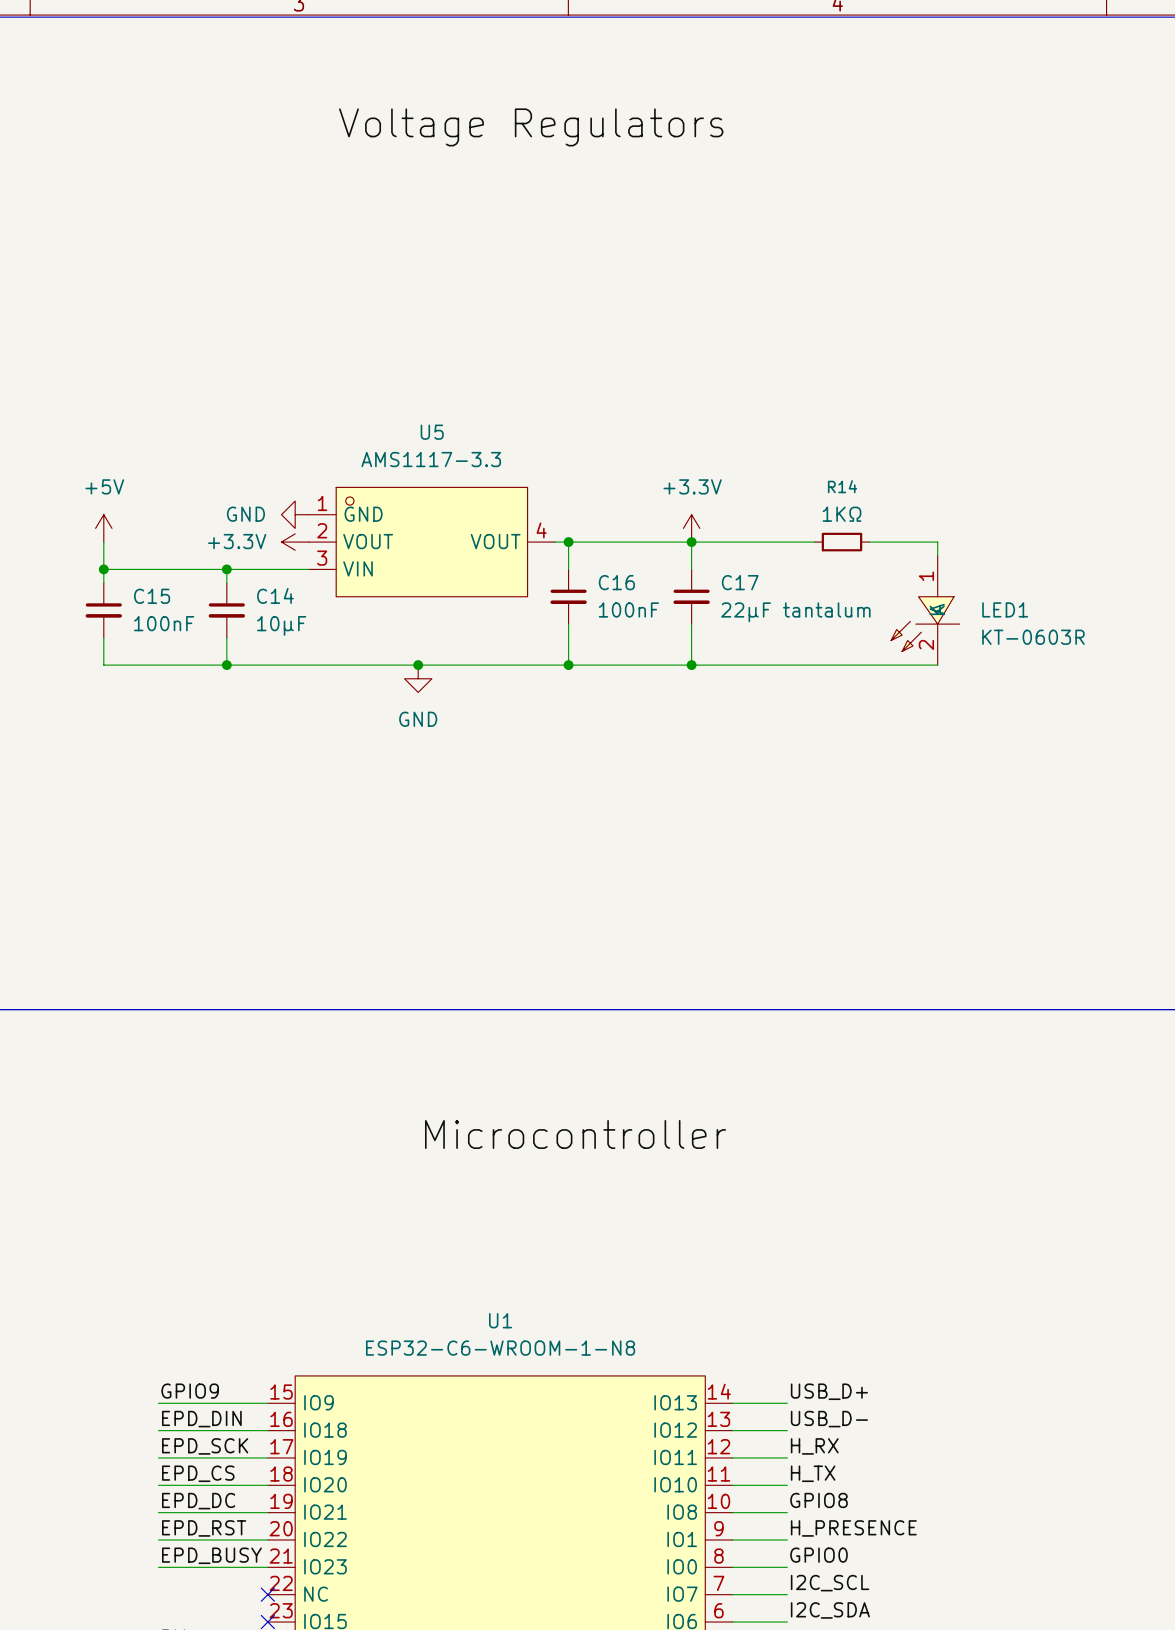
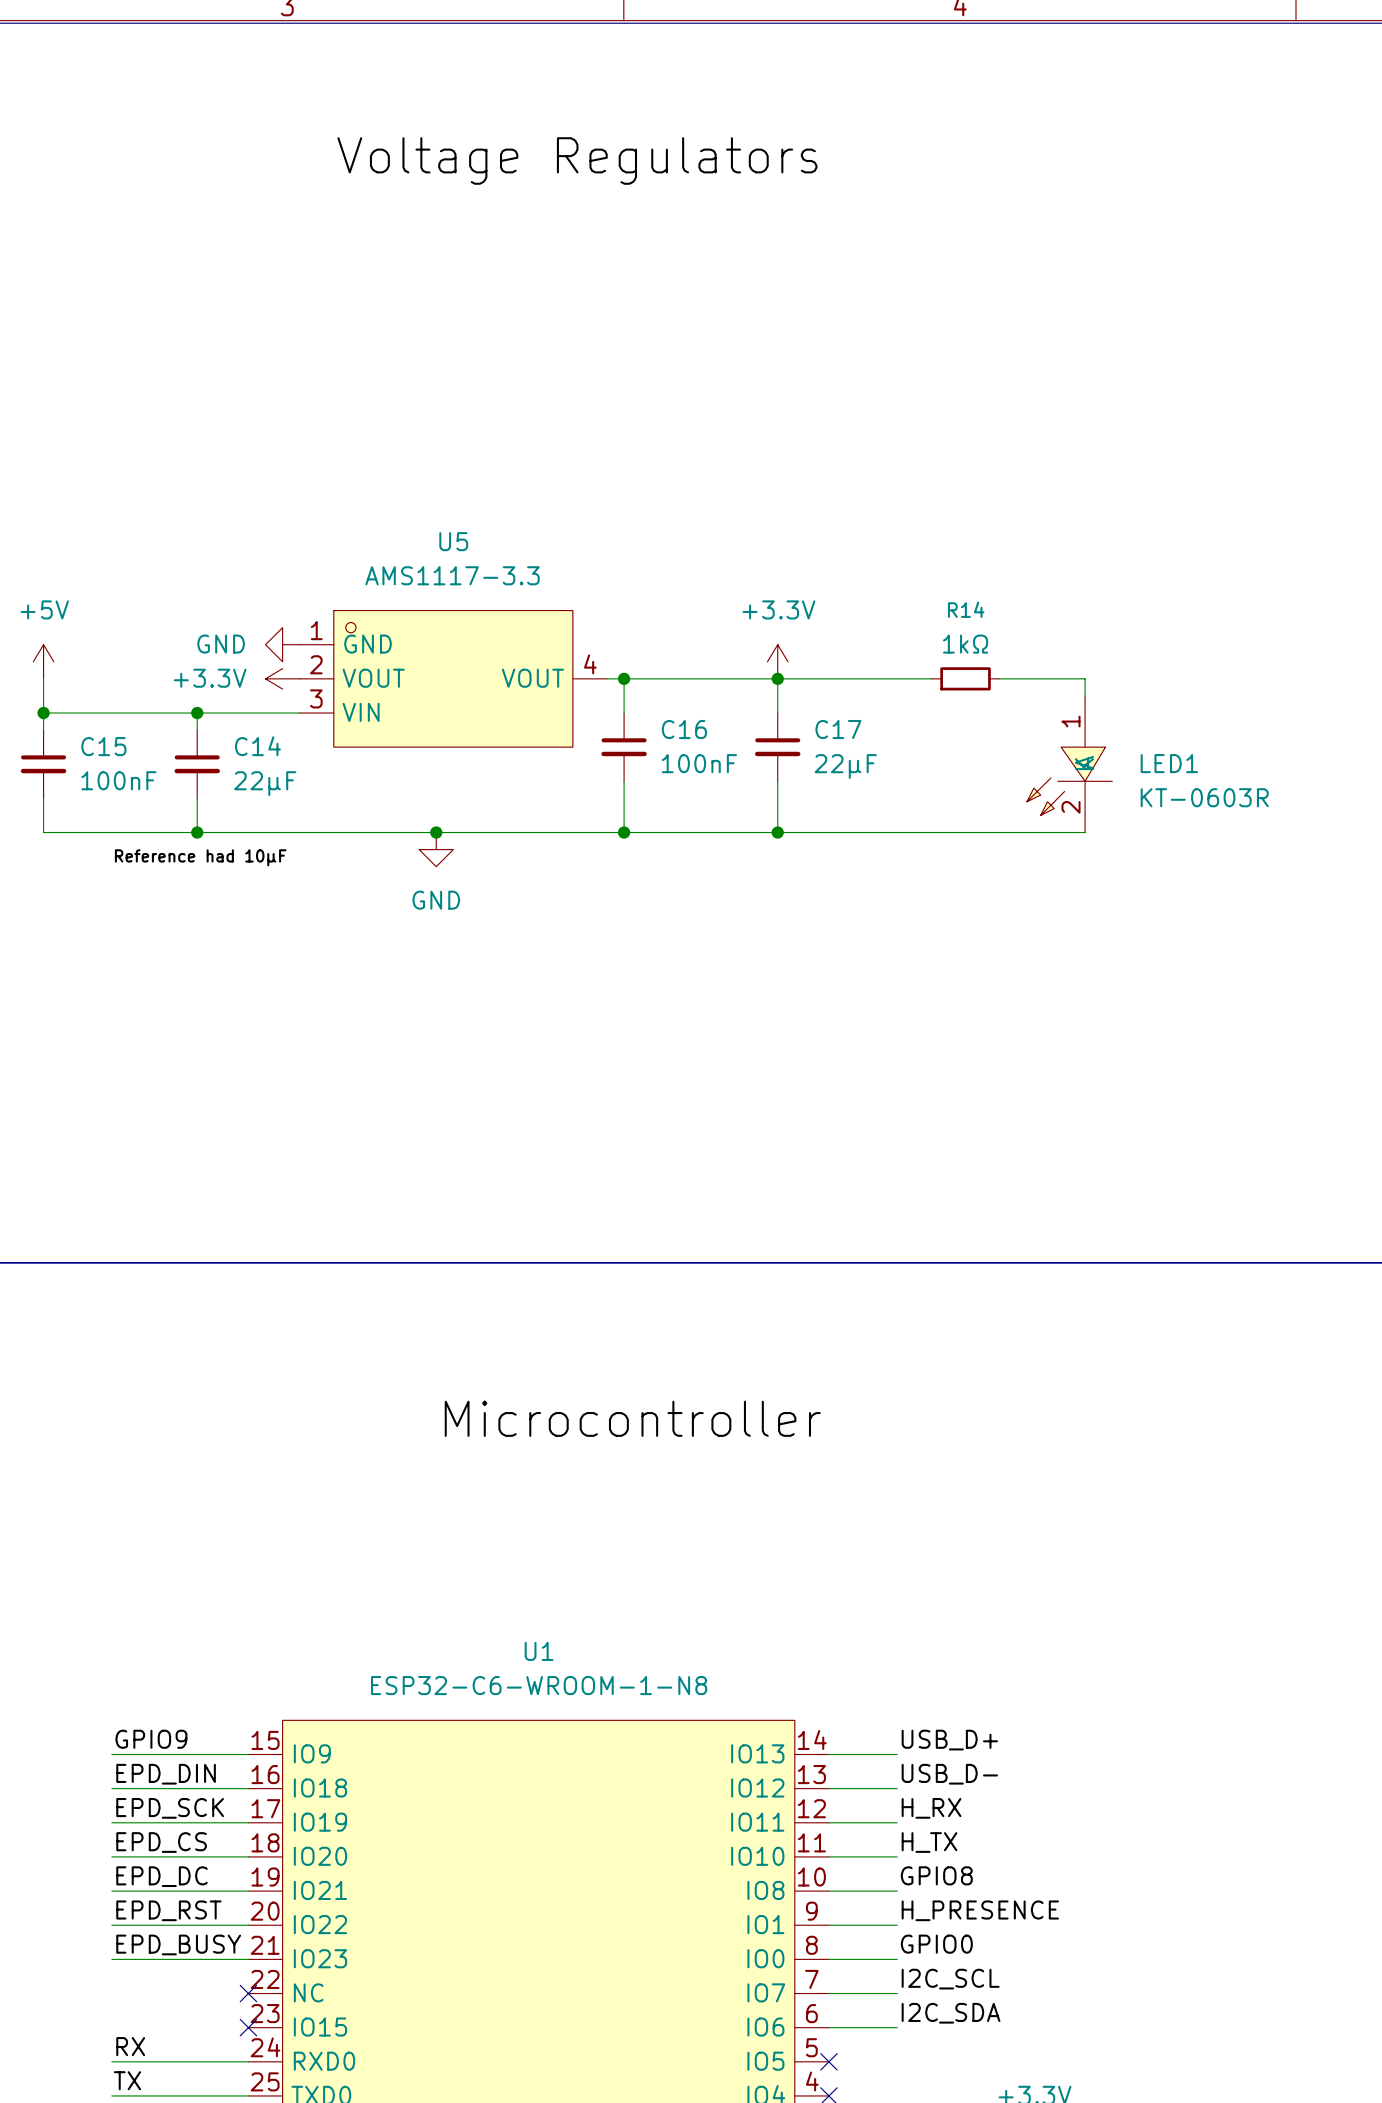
R14 value: 1KΩ (841, 514) -> 1kΩ (965, 644)
C17 value: 22µF tantalum (795, 612) -> 22µF (845, 766)
C14 value: 10µF (281, 625) -> 22µF (265, 783)
label: none -> Reference had 10µF (200, 857)

